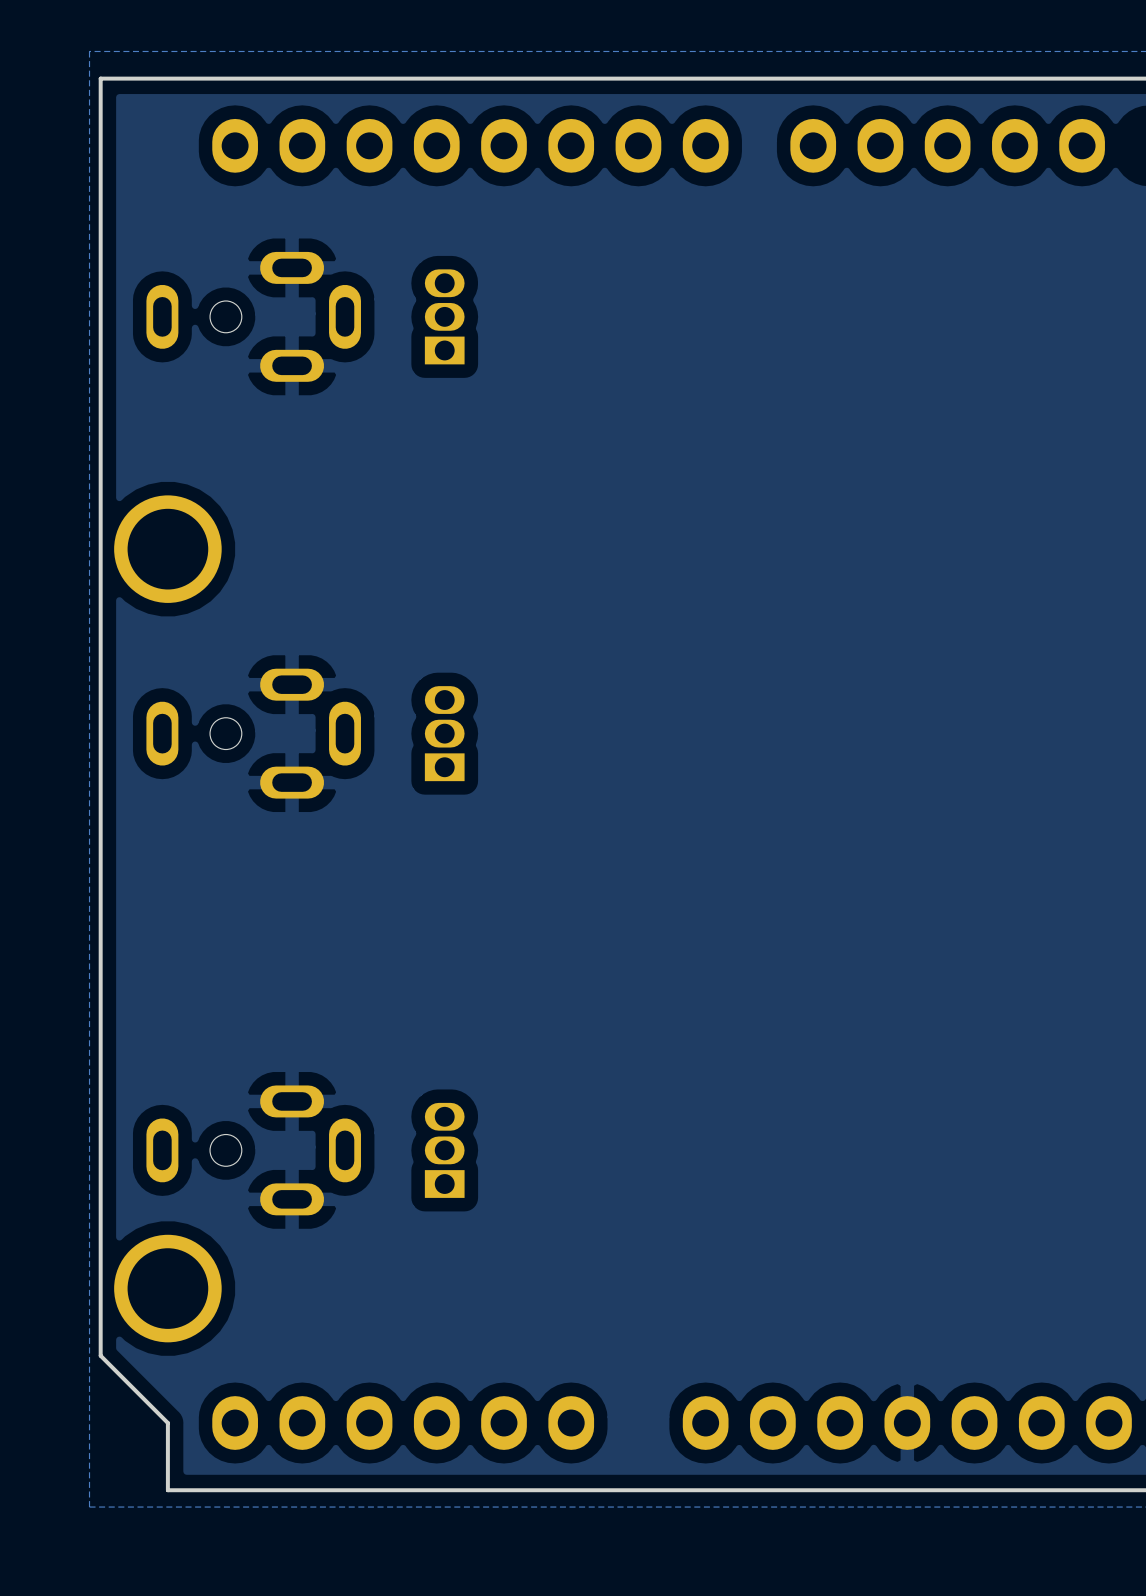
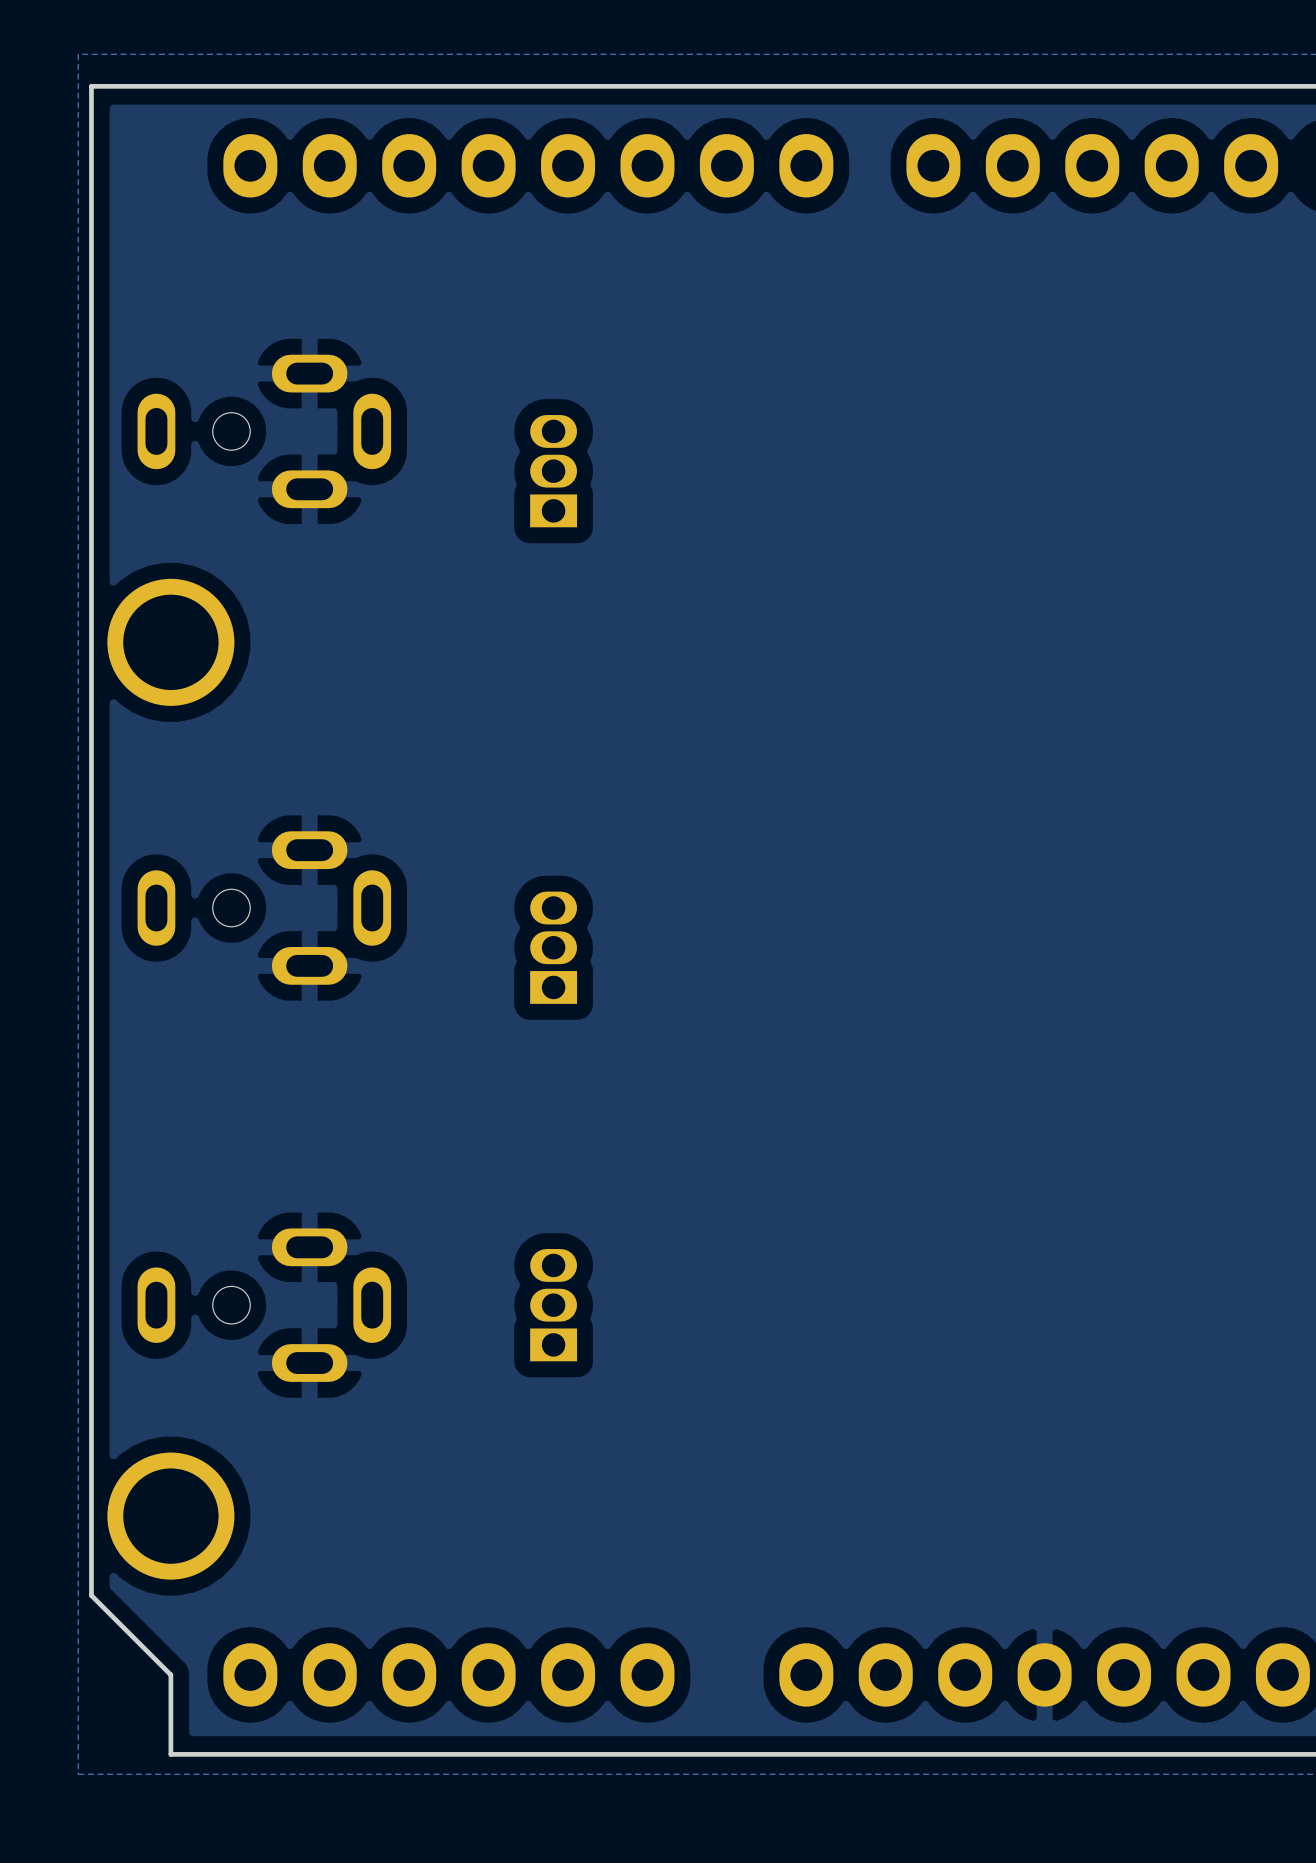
part position: (253, 316) -> (264, 431)
part position: (444, 316) -> (553, 471)
part position: (253, 733) -> (264, 908)
part position: (444, 733) -> (553, 947)
part position: (253, 1150) -> (264, 1305)
part position: (444, 1150) -> (553, 1305)

